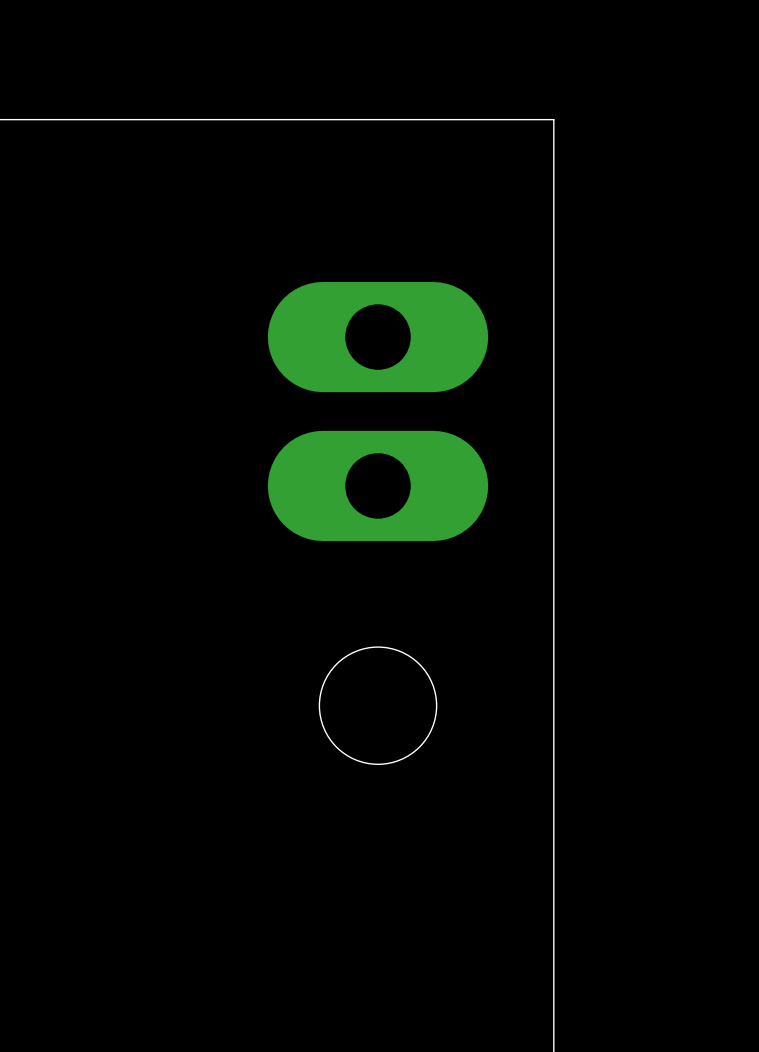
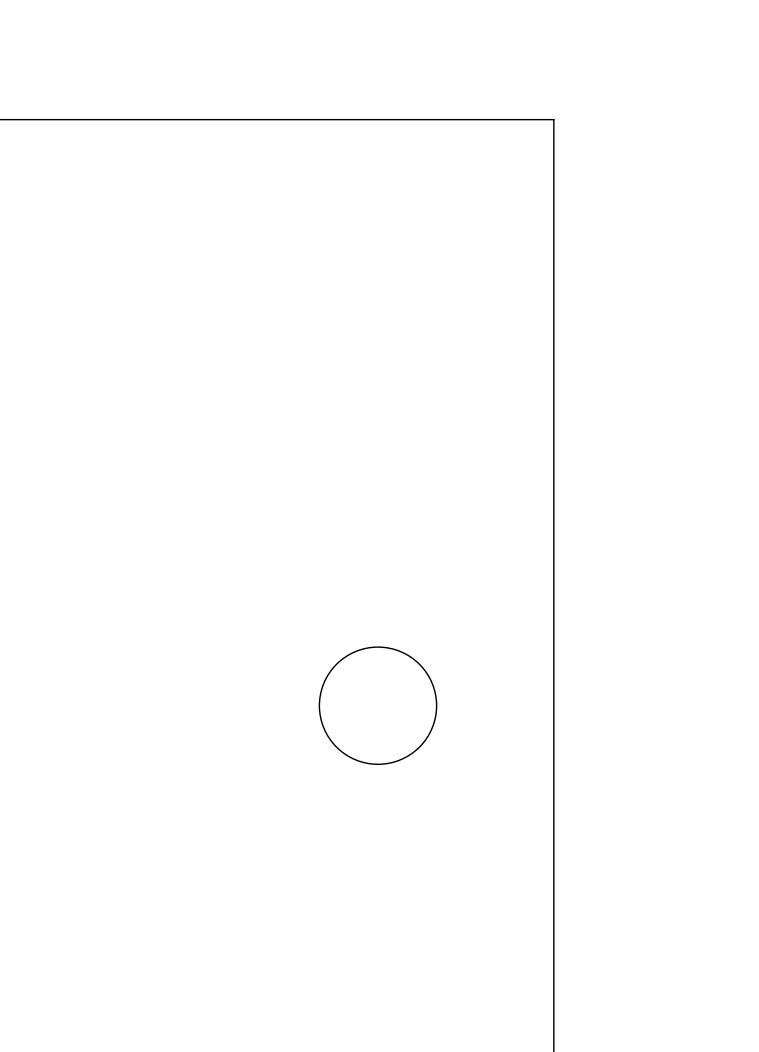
part: (378, 411) -> none

